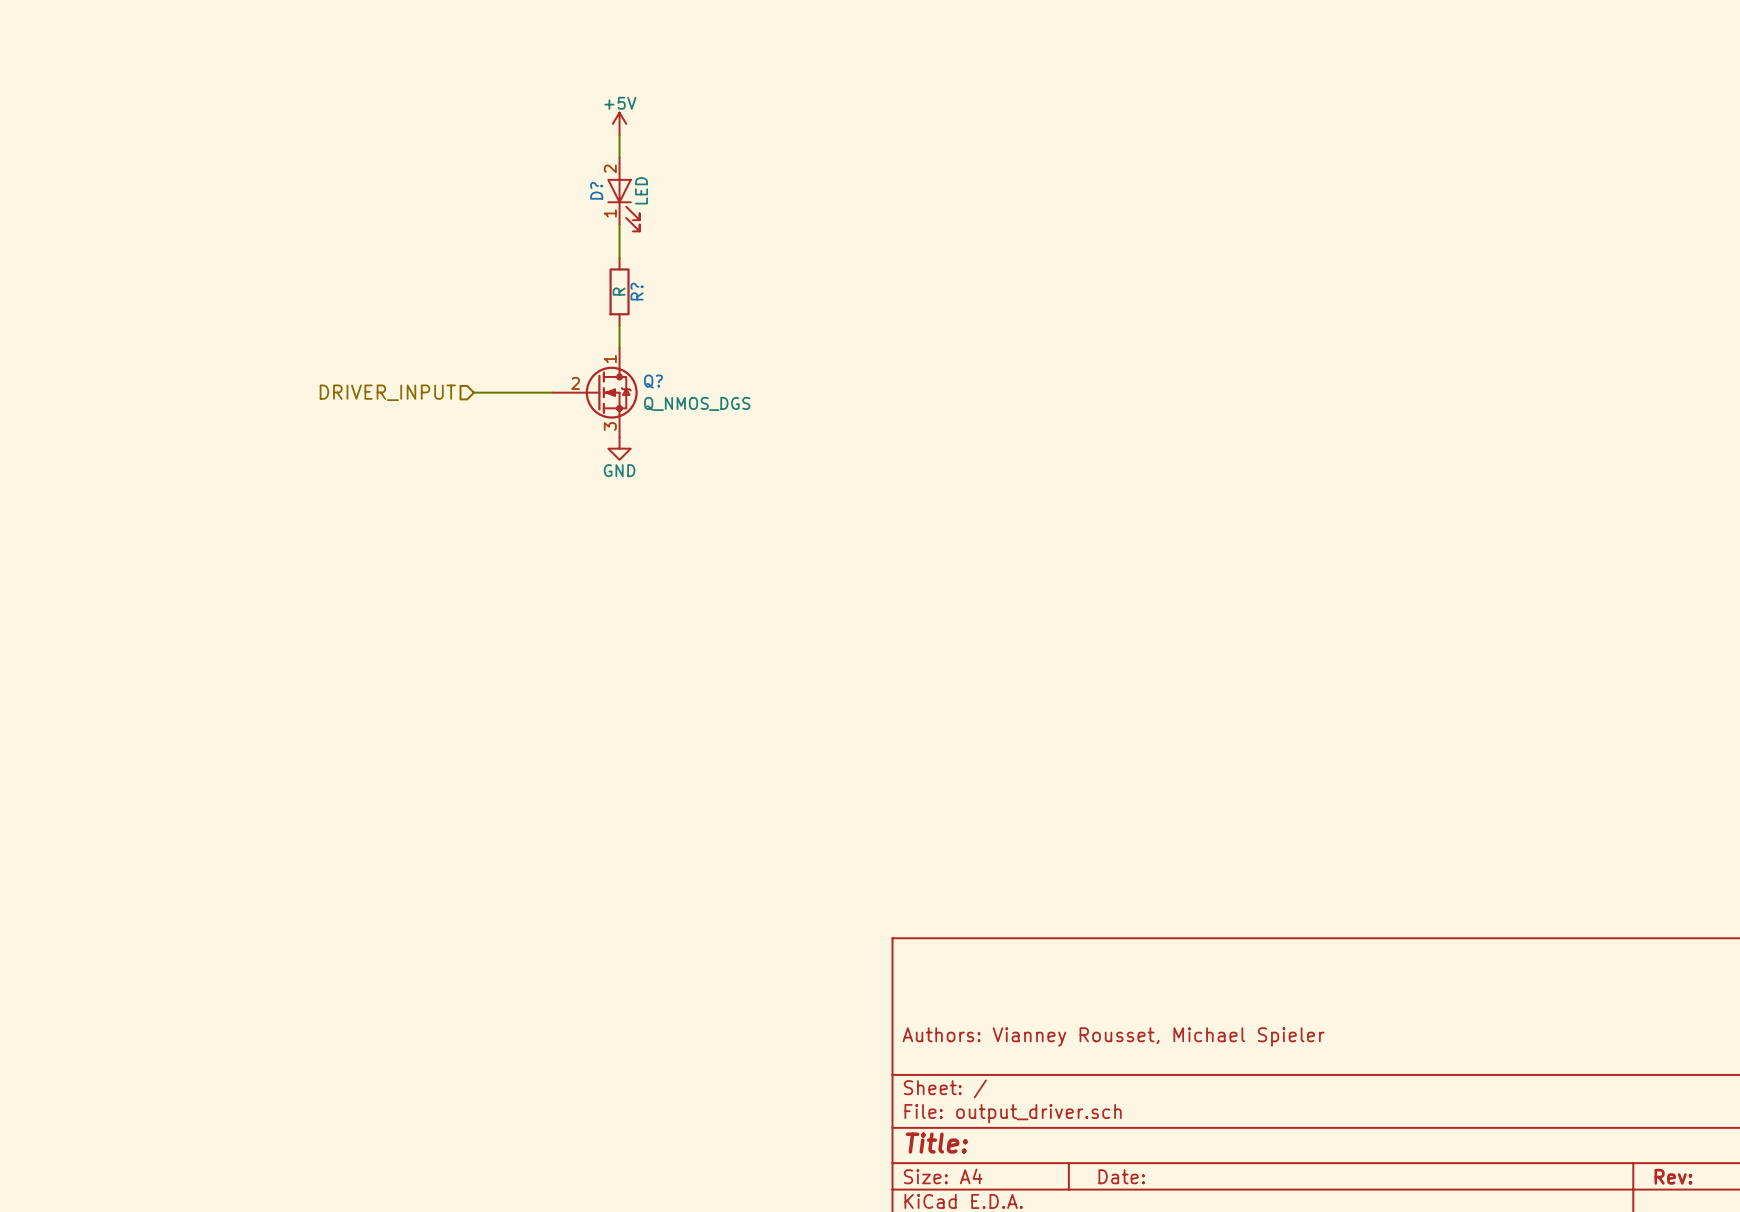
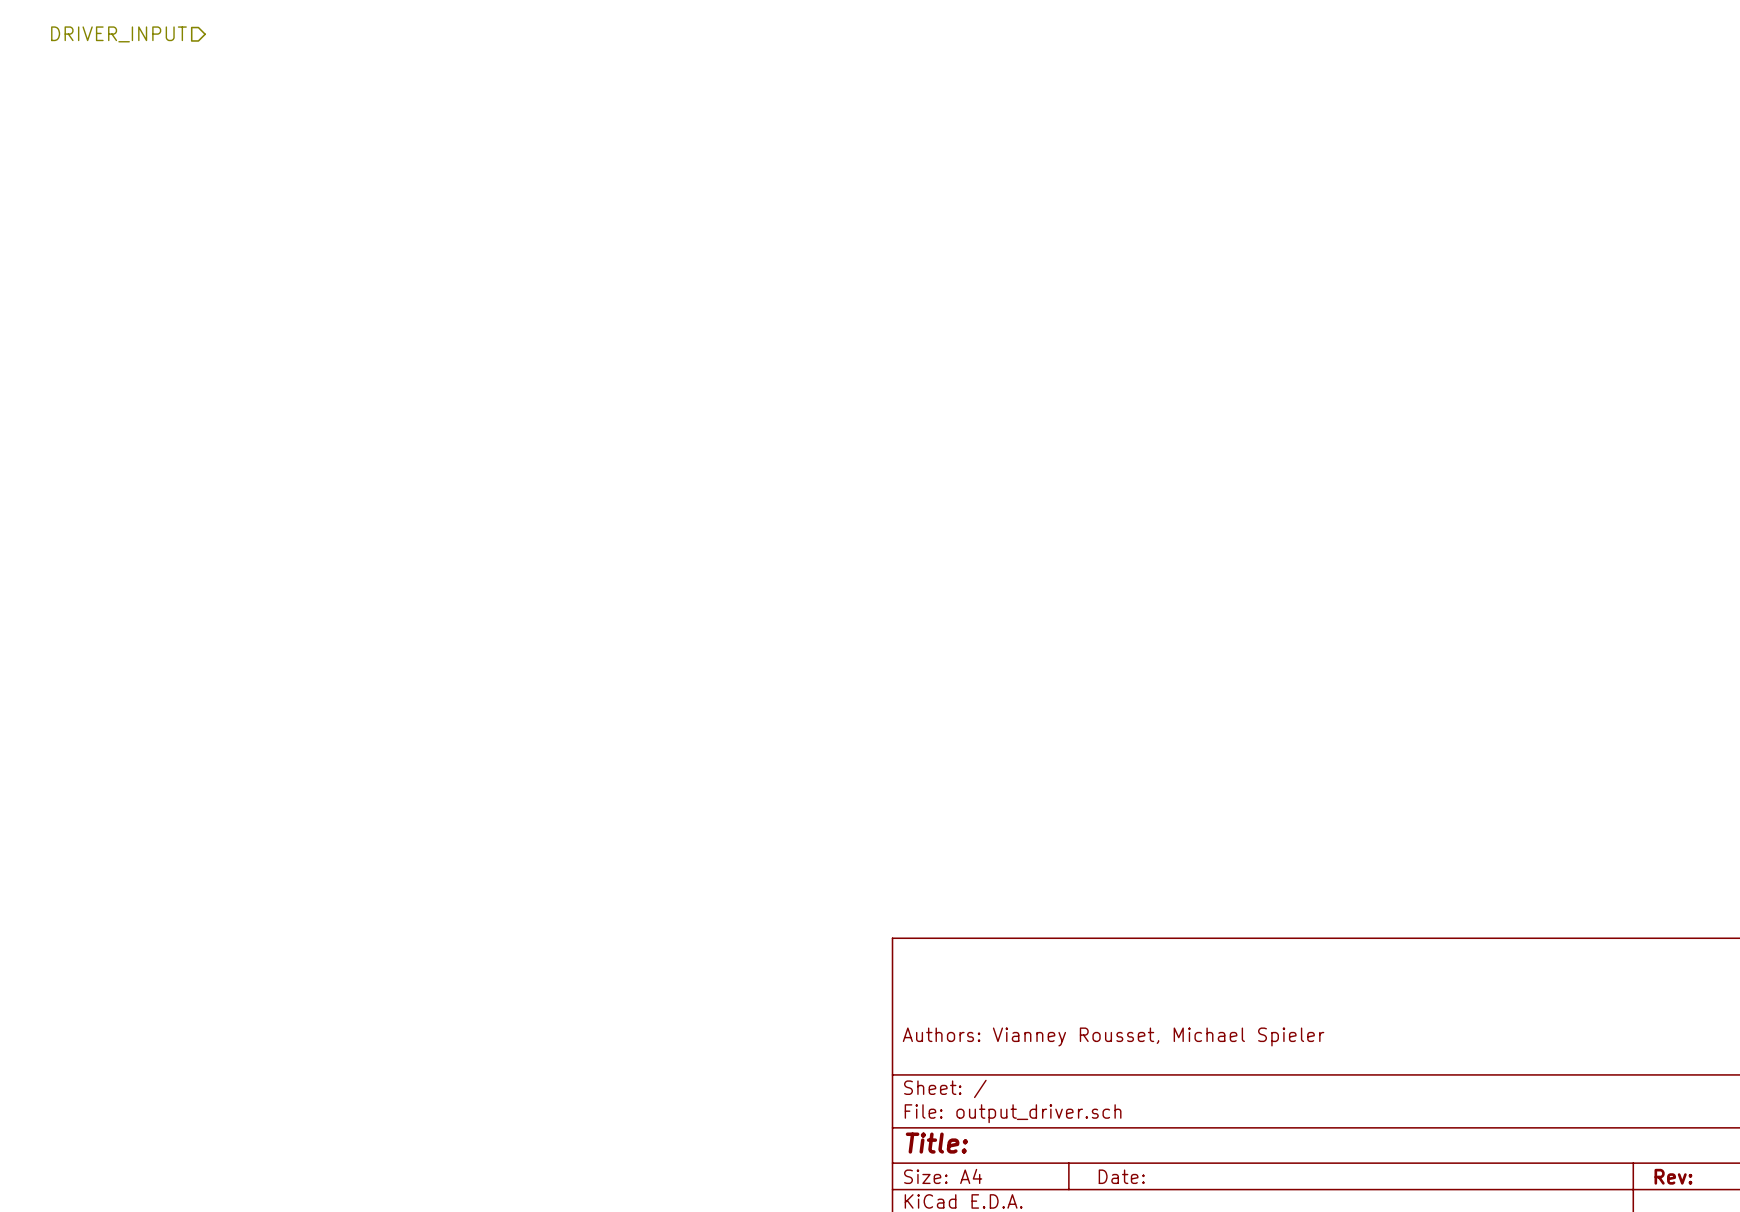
hierarchical label: none -> DRIVER_INPUT (118, 34)
power symbol: +5V (619, 123) -> none
wire: (619, 135) (619, 157) -> none
D?: LED (623, 194) -> none
wire: (619, 224) (619, 258) -> none
R?: R (619, 291) -> none
wire: (619, 325) (619, 347) -> none
hierarchical label: DRIVER_INPUT (387, 392) -> none
wire: (473, 392) (552, 392) -> none
Q?: Q_NMOS_DGS (595, 392) -> none
power symbol: GND (619, 448) -> none

